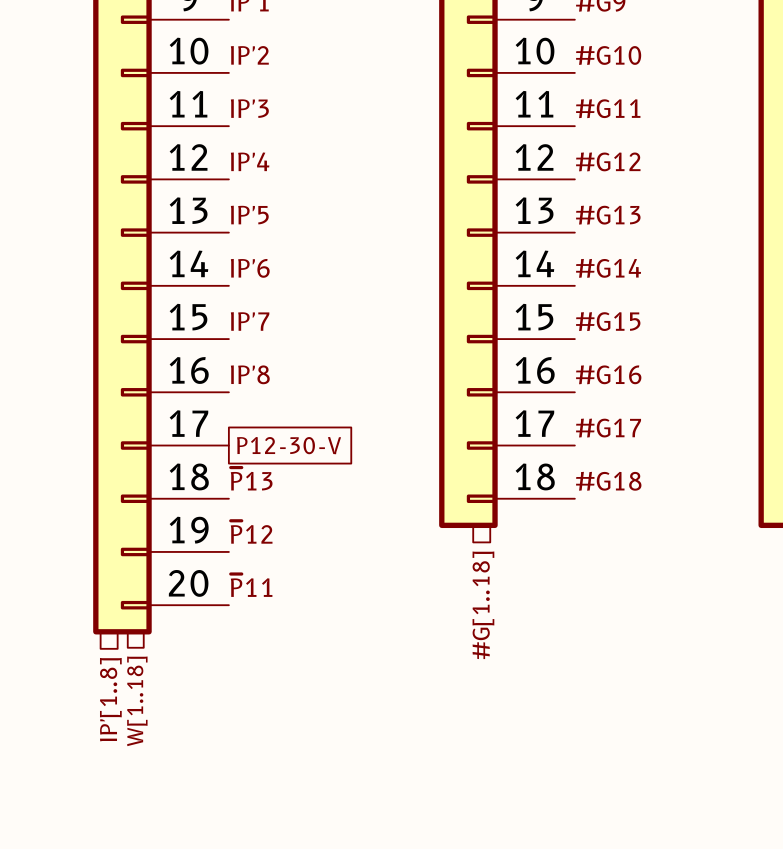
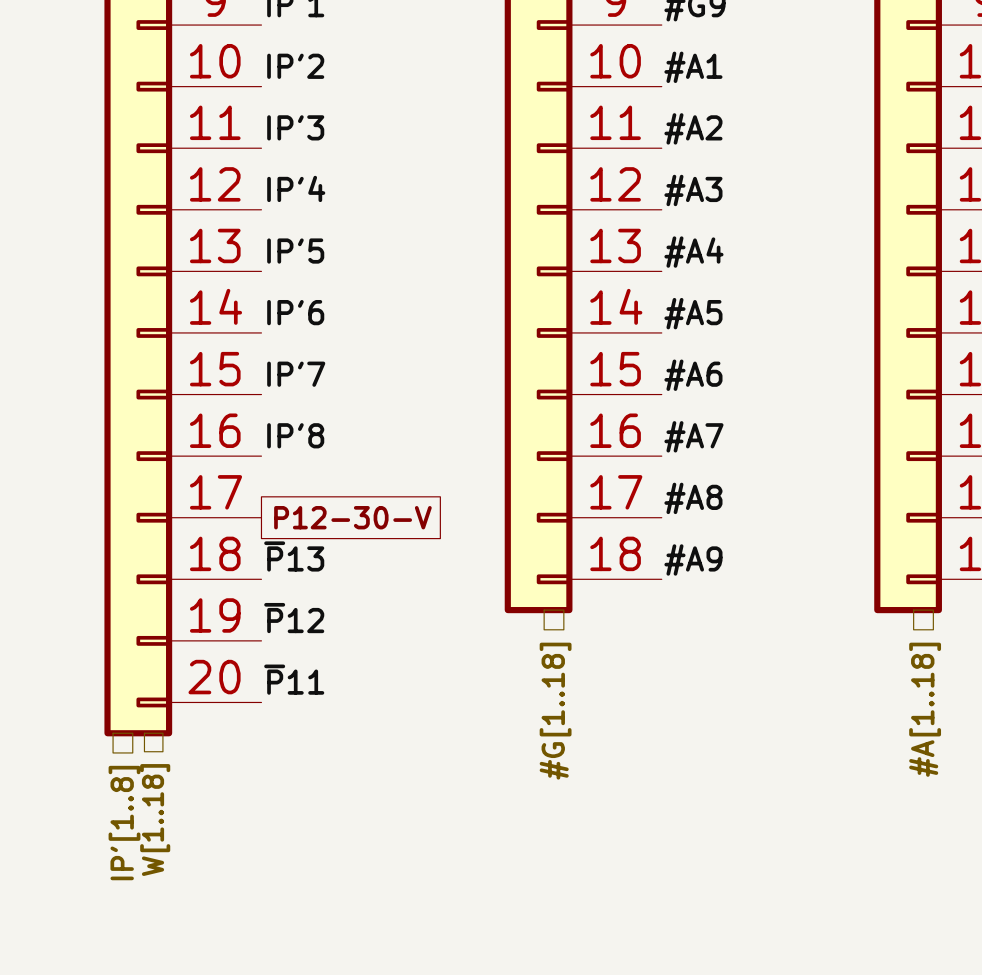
label: #G10 (608, 55) -> #A1 (693, 67)
label: #G11 (608, 108) -> #A2 (693, 128)
label: #G12 (608, 161) -> #A3 (693, 190)
label: #G13 (608, 215) -> #A4 (693, 252)
label: #G14 (608, 268) -> #A5 (693, 313)
label: #G15 (608, 321) -> #A6 (693, 375)
label: #G16 (608, 374) -> #A7 (693, 436)
label: #G17 (608, 428) -> #A8 (693, 498)
label: #G18 (608, 481) -> #A9 (693, 559)

